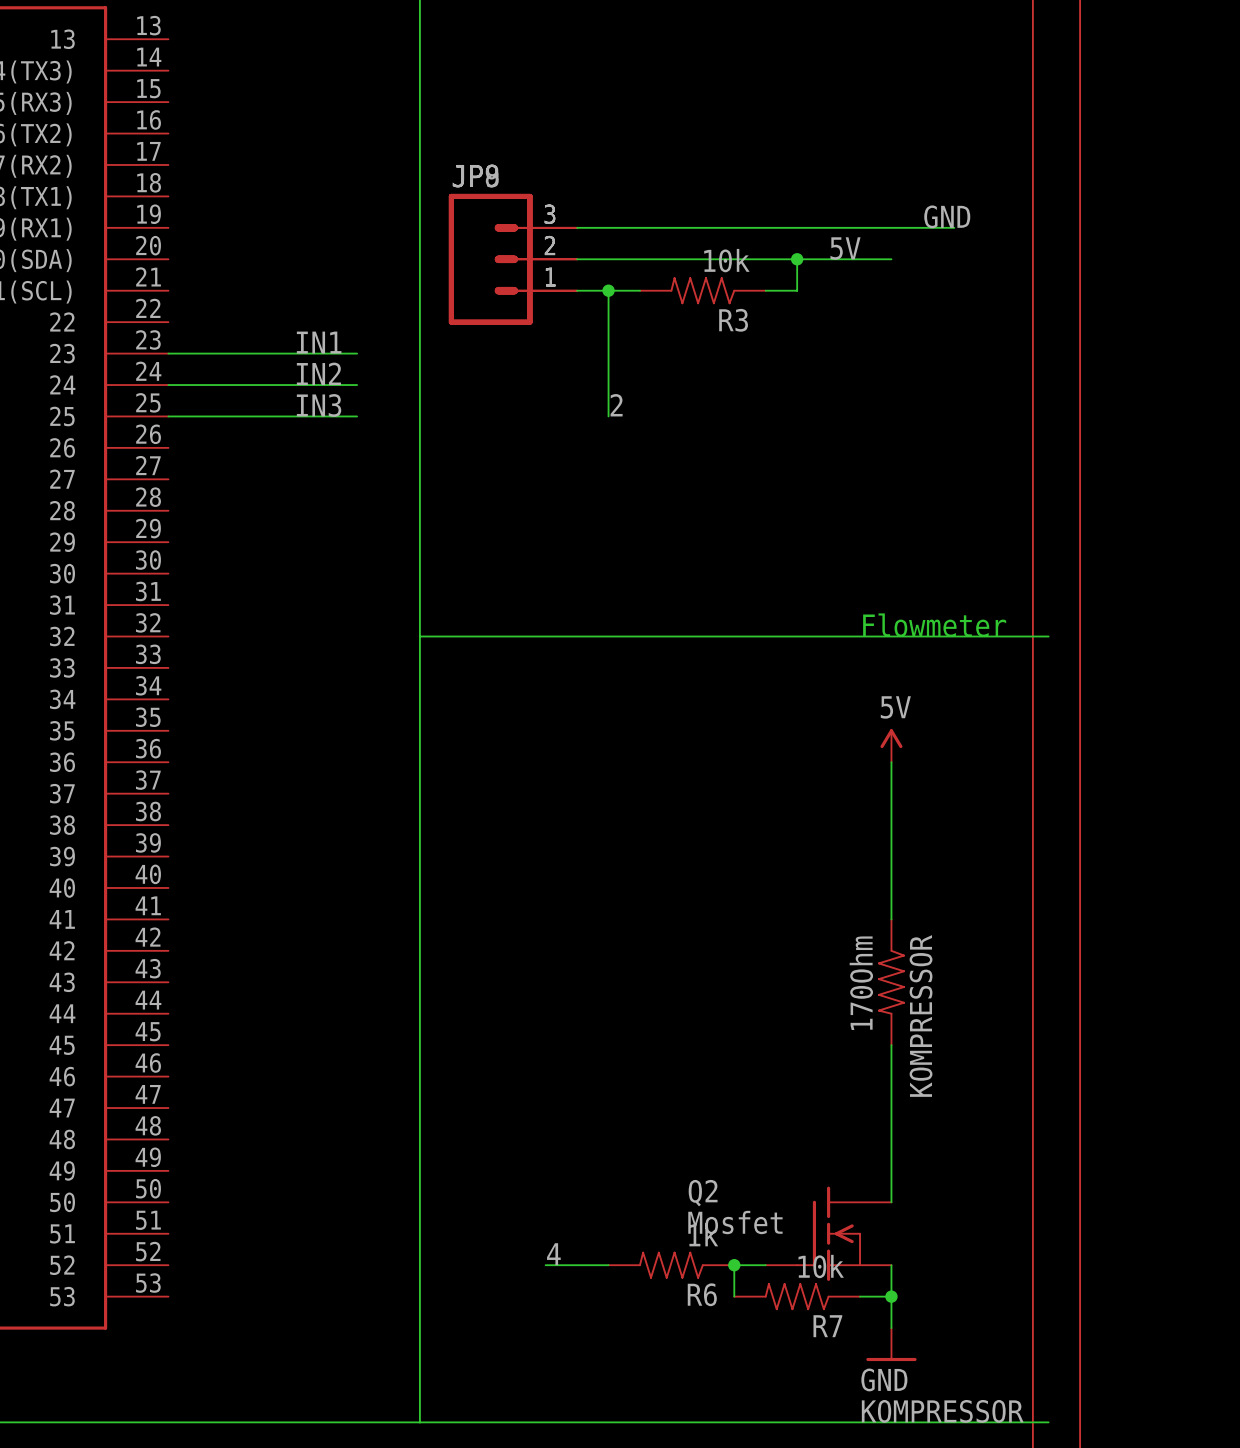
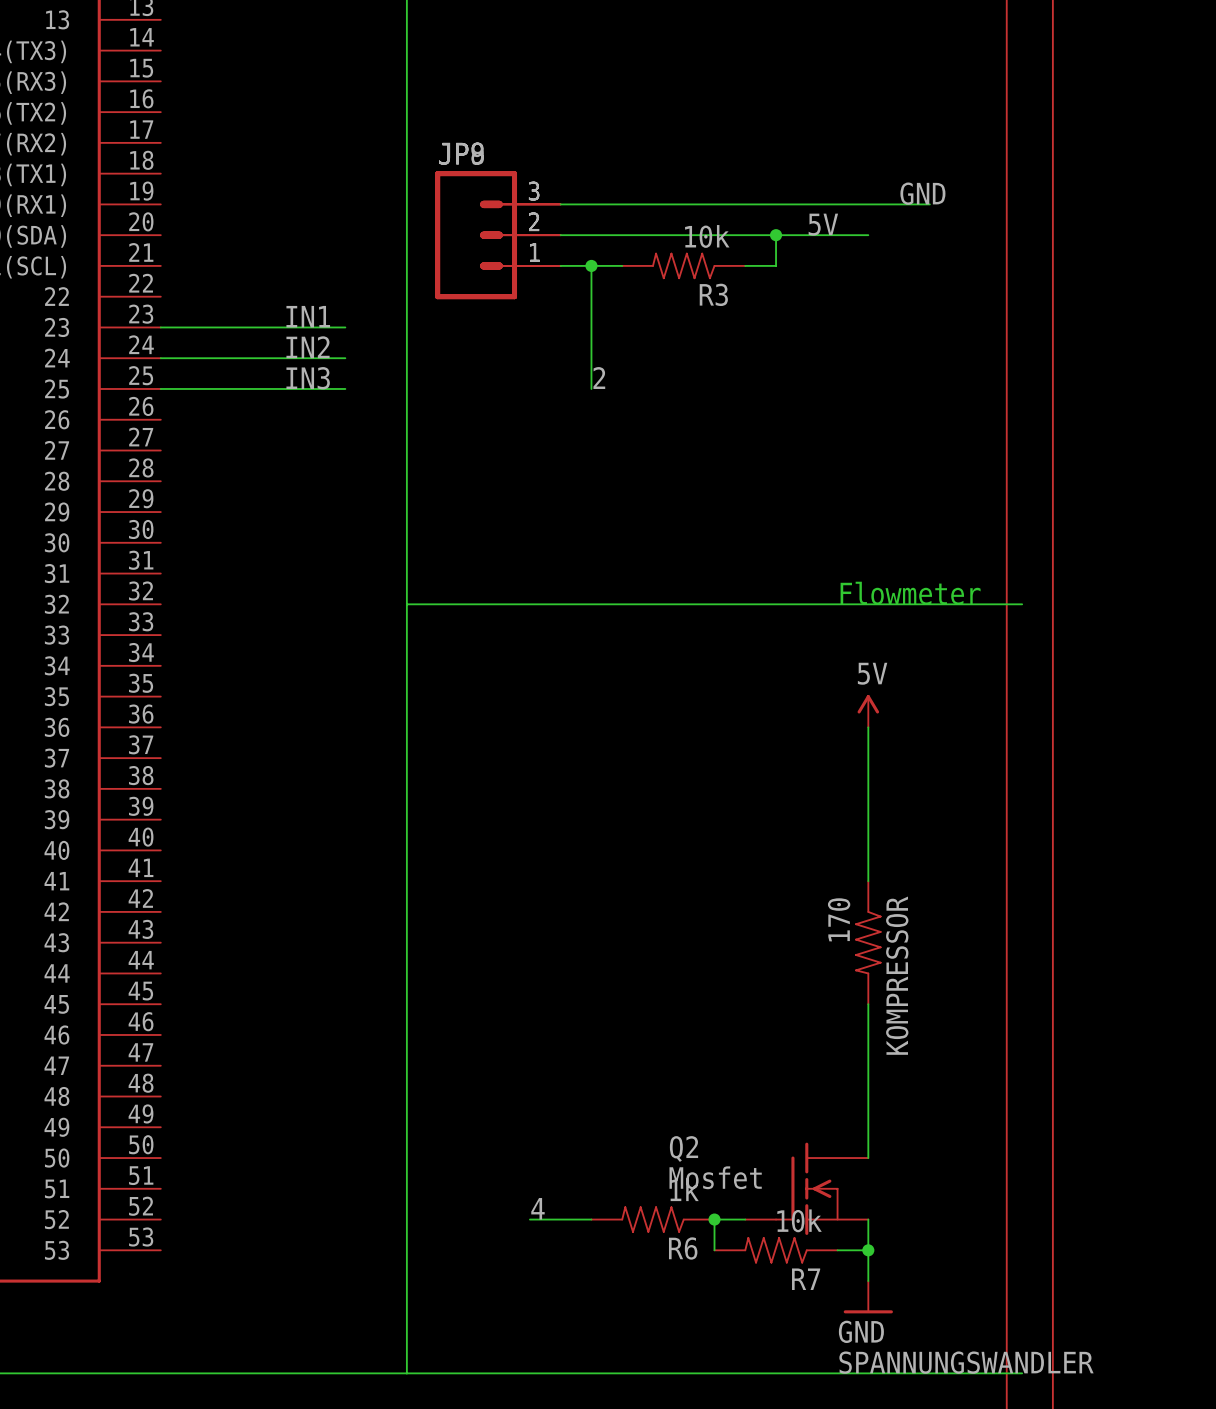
KOMPRESSOR value: 170Ohm (861, 983) -> 170 (839, 919)
label: KOMPRESSOR (942, 1411) -> SPANNUNGSWANDLER (966, 1362)

